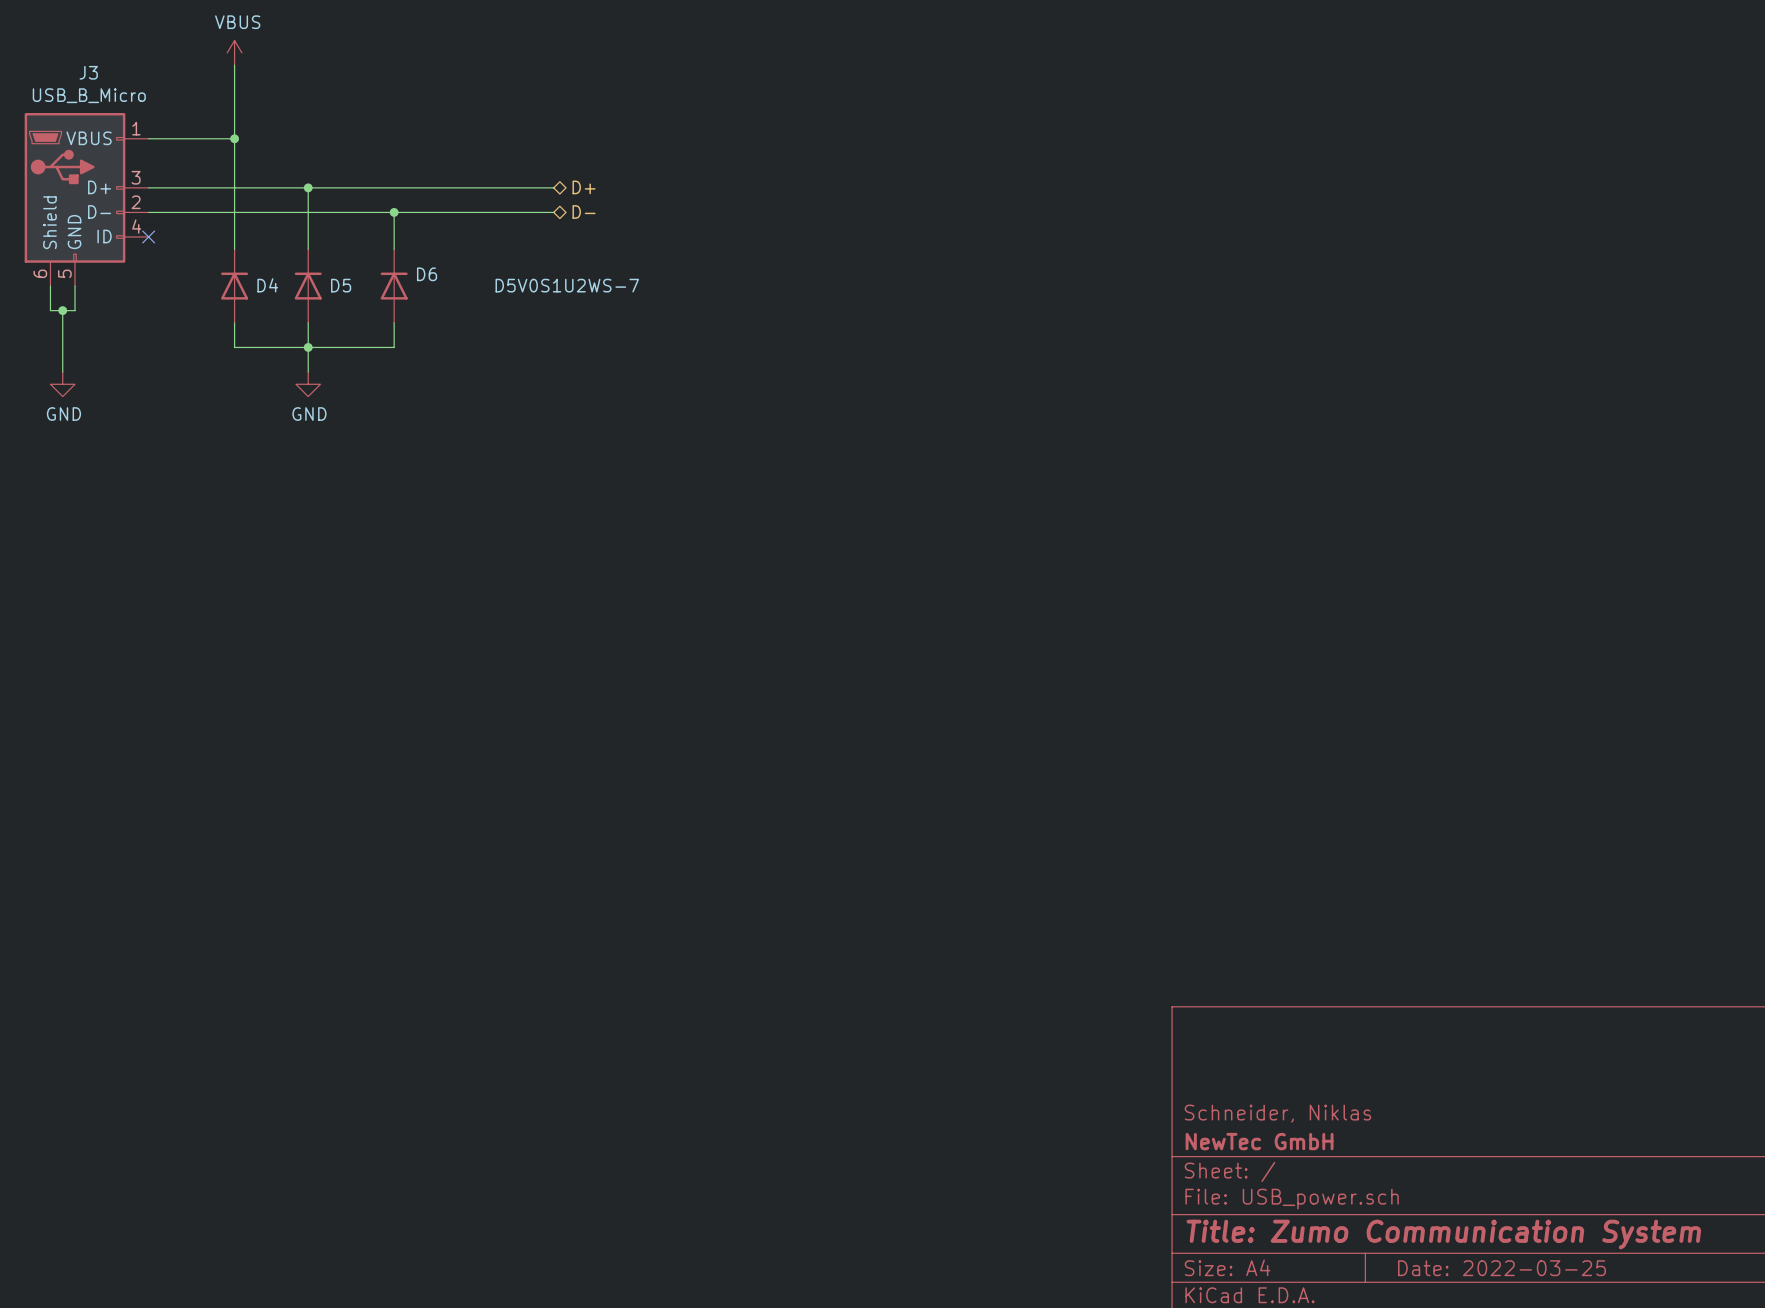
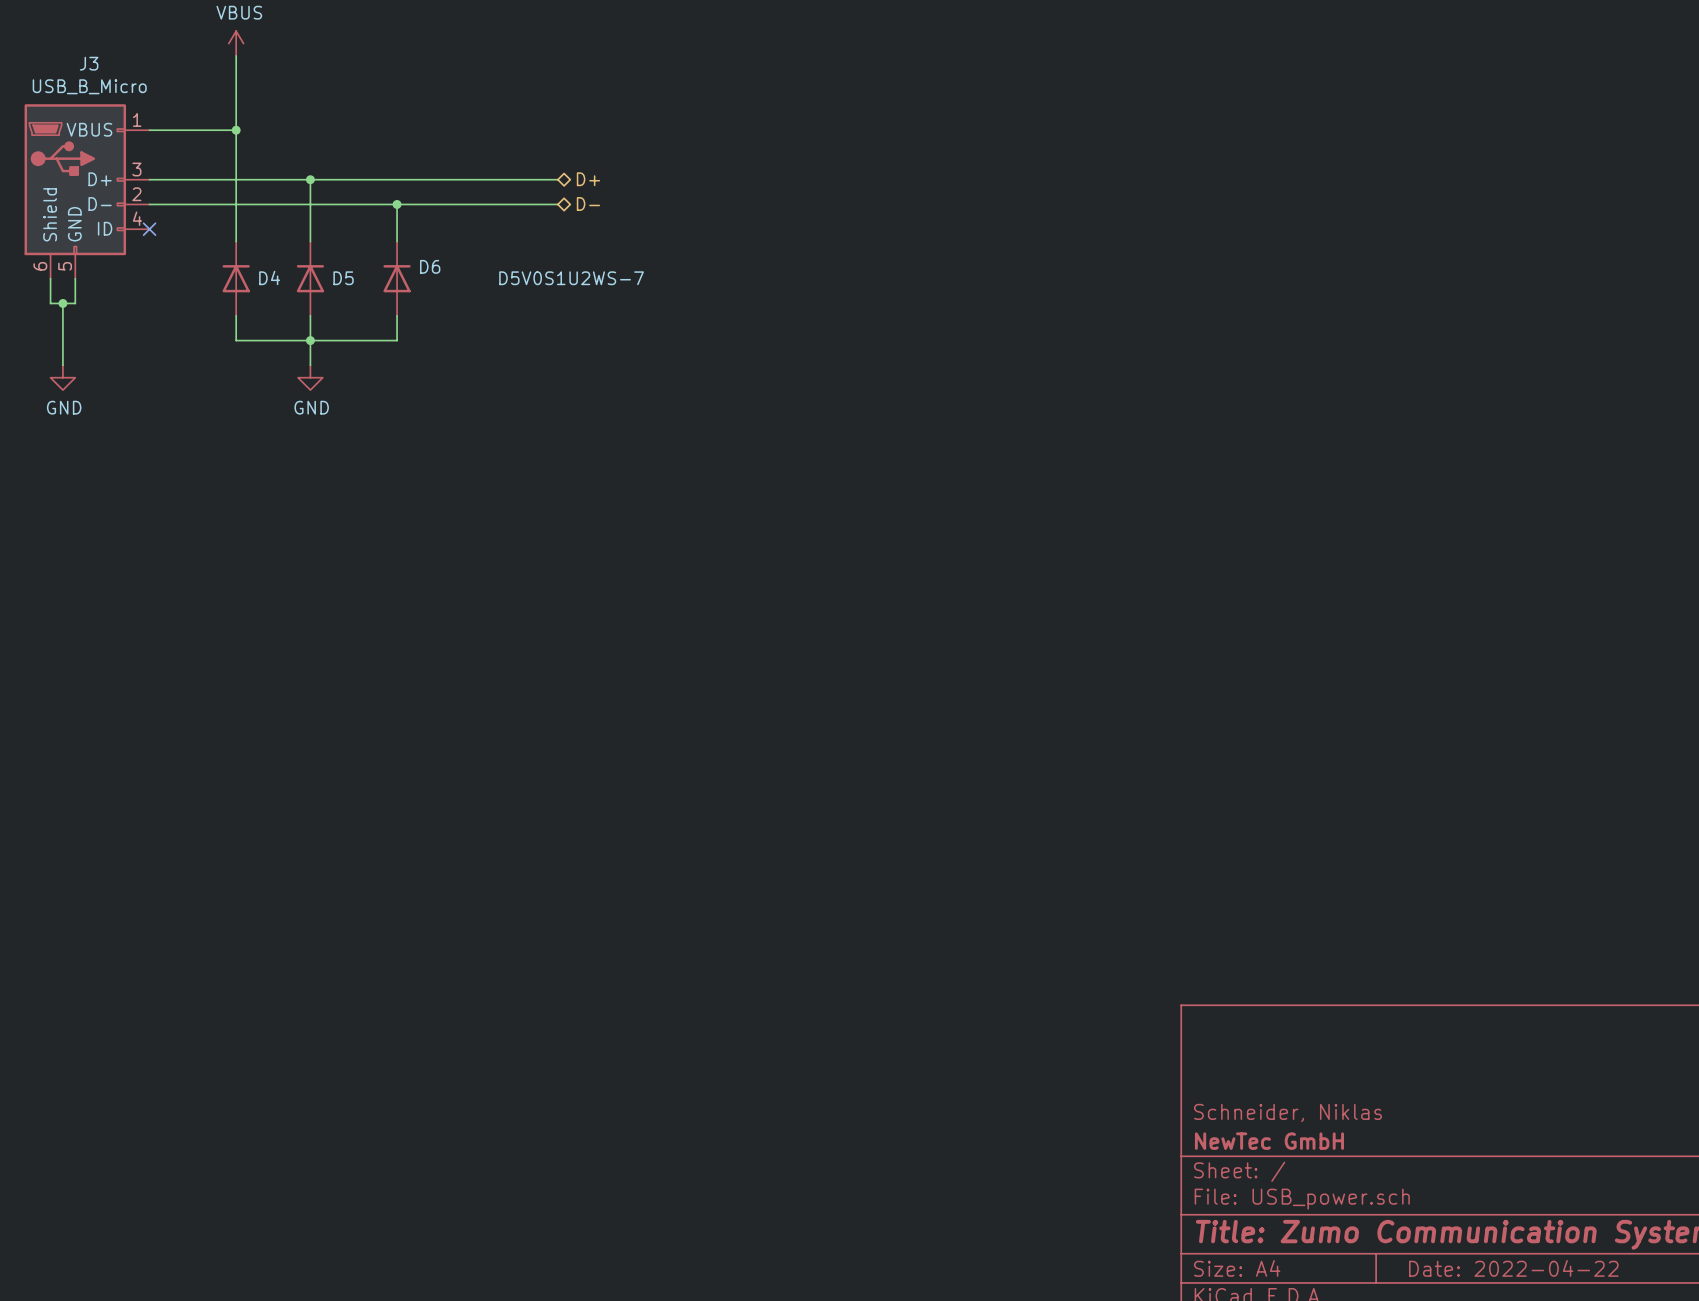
title block: Date: 2022-03-25 (1501, 1268) -> Date: 2022-04-22 (1513, 1268)

